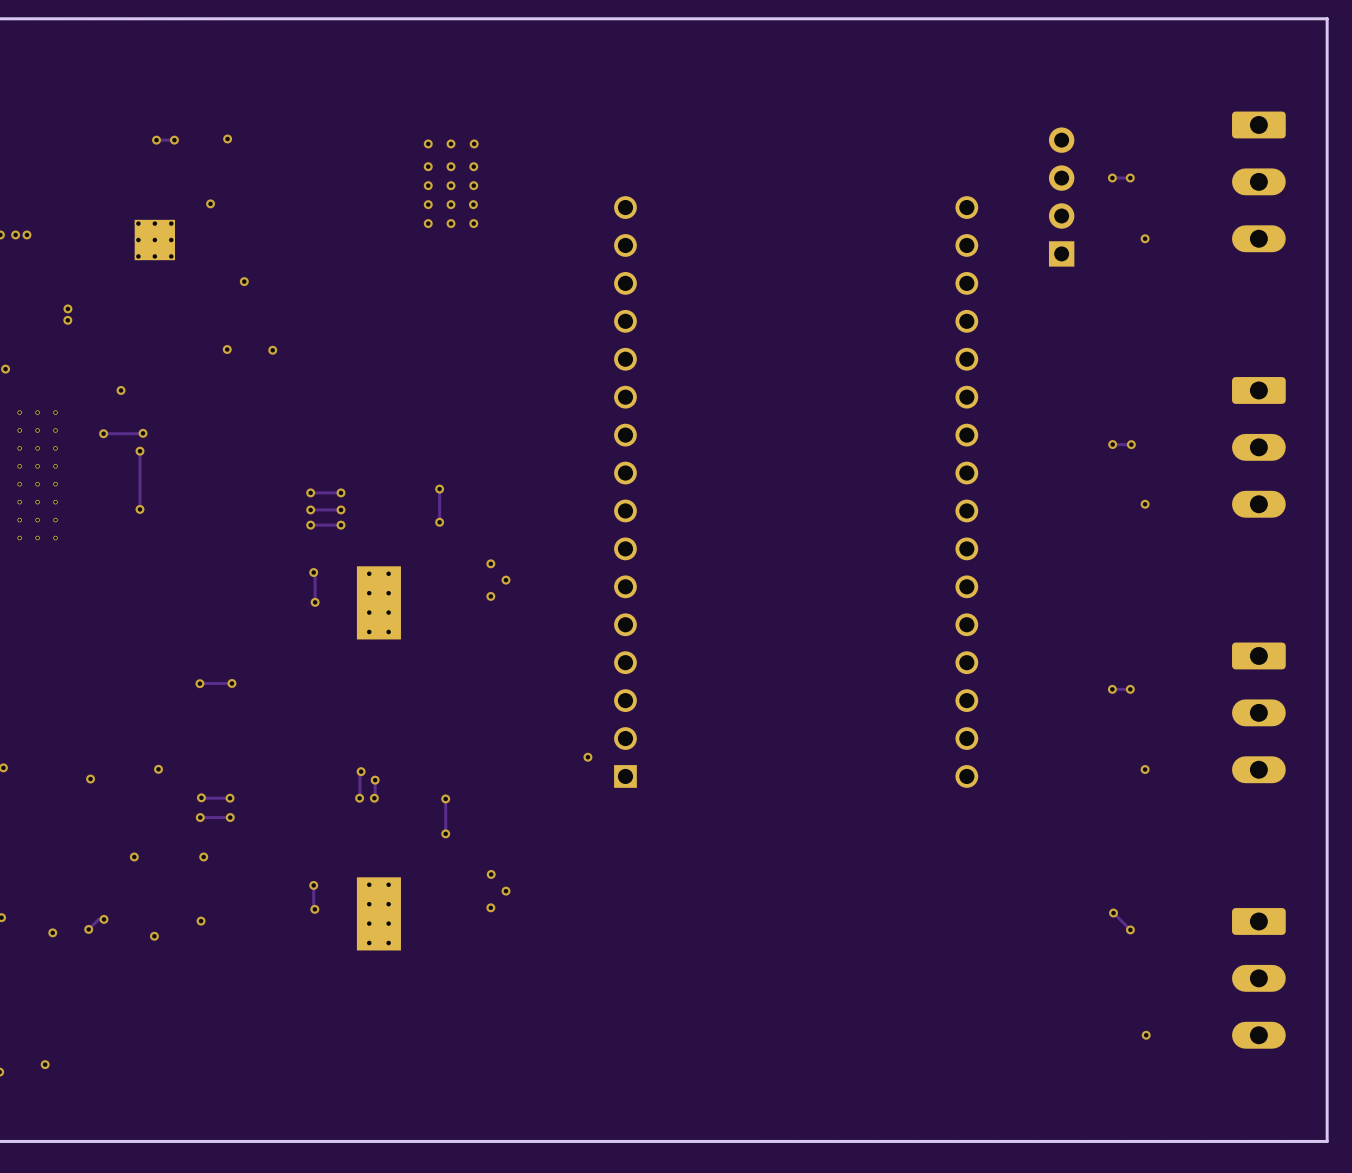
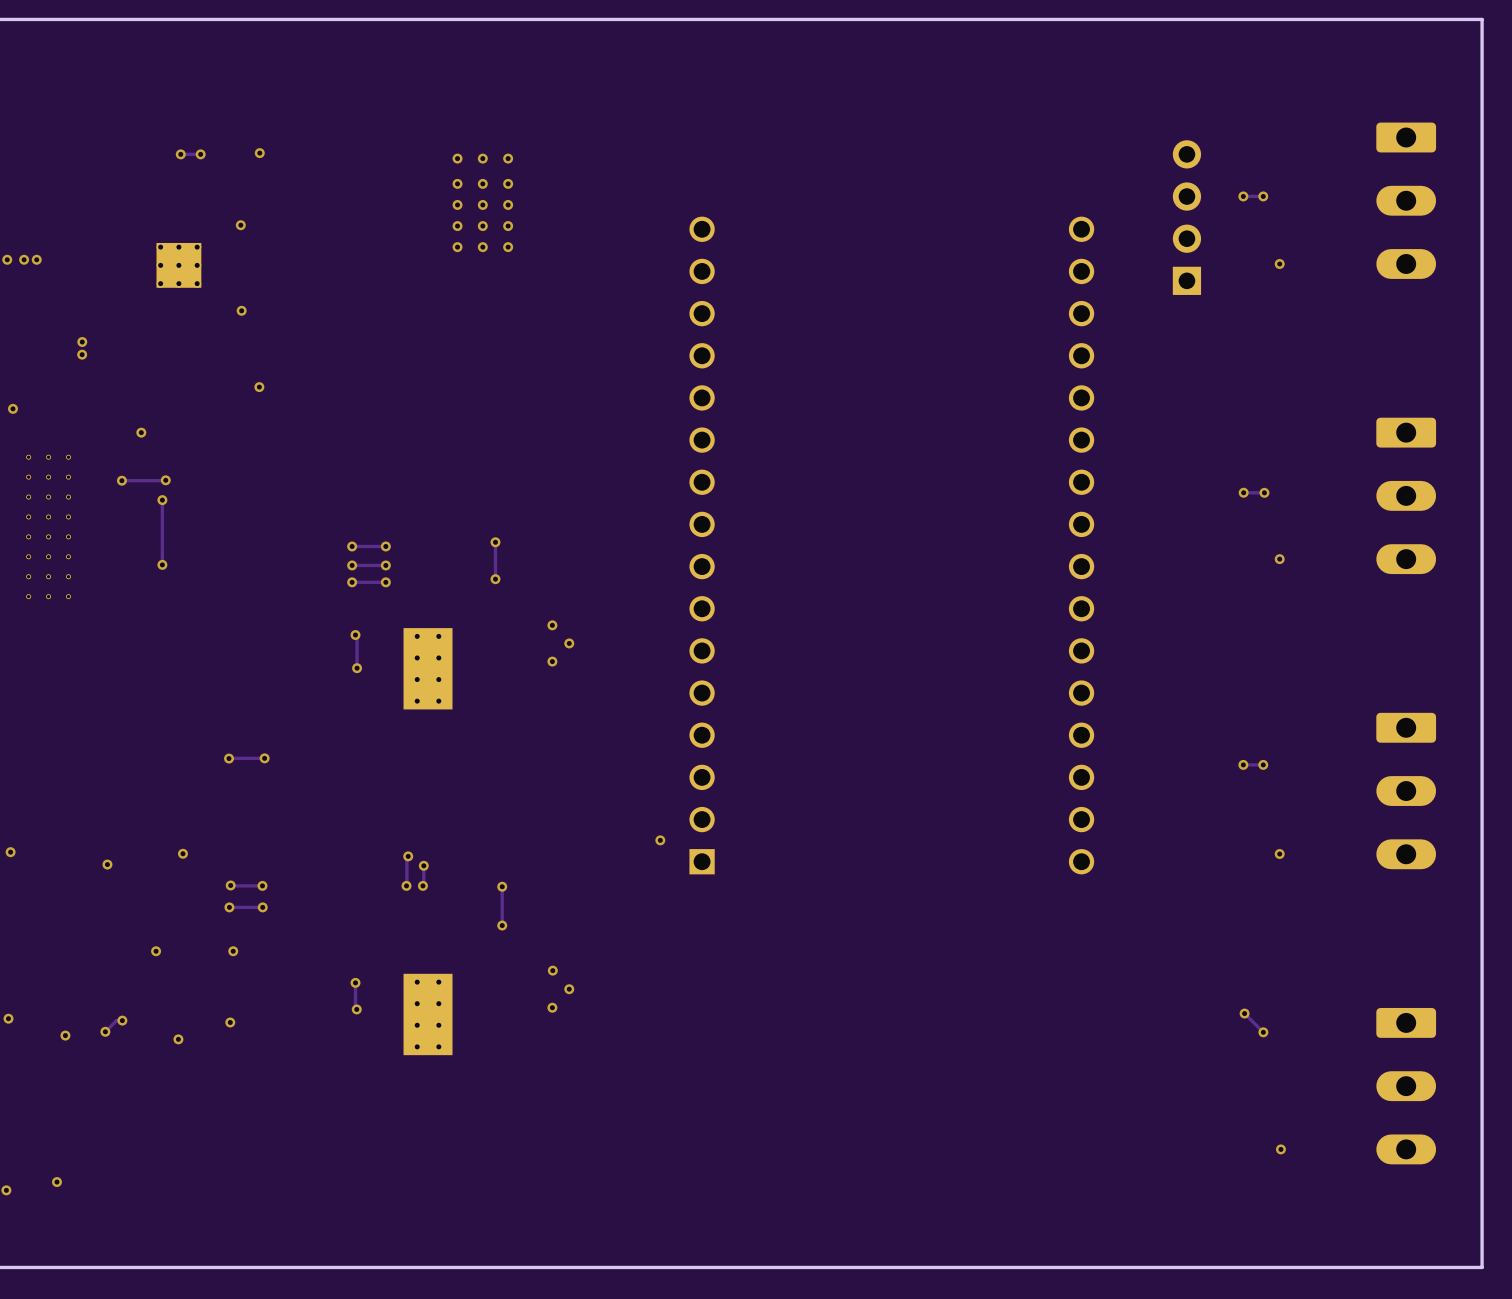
via: none -> (457, 158)
via: (474, 143) -> none
via: none -> (457, 183)
via: (473, 166) -> none
via: none -> (457, 204)
via: (473, 185) -> none
via: none -> (457, 226)
via: (473, 204) -> none
via: none -> (457, 247)
via: (473, 223) -> none
via position: (244, 281) -> (241, 310)
via: (272, 350) -> none

